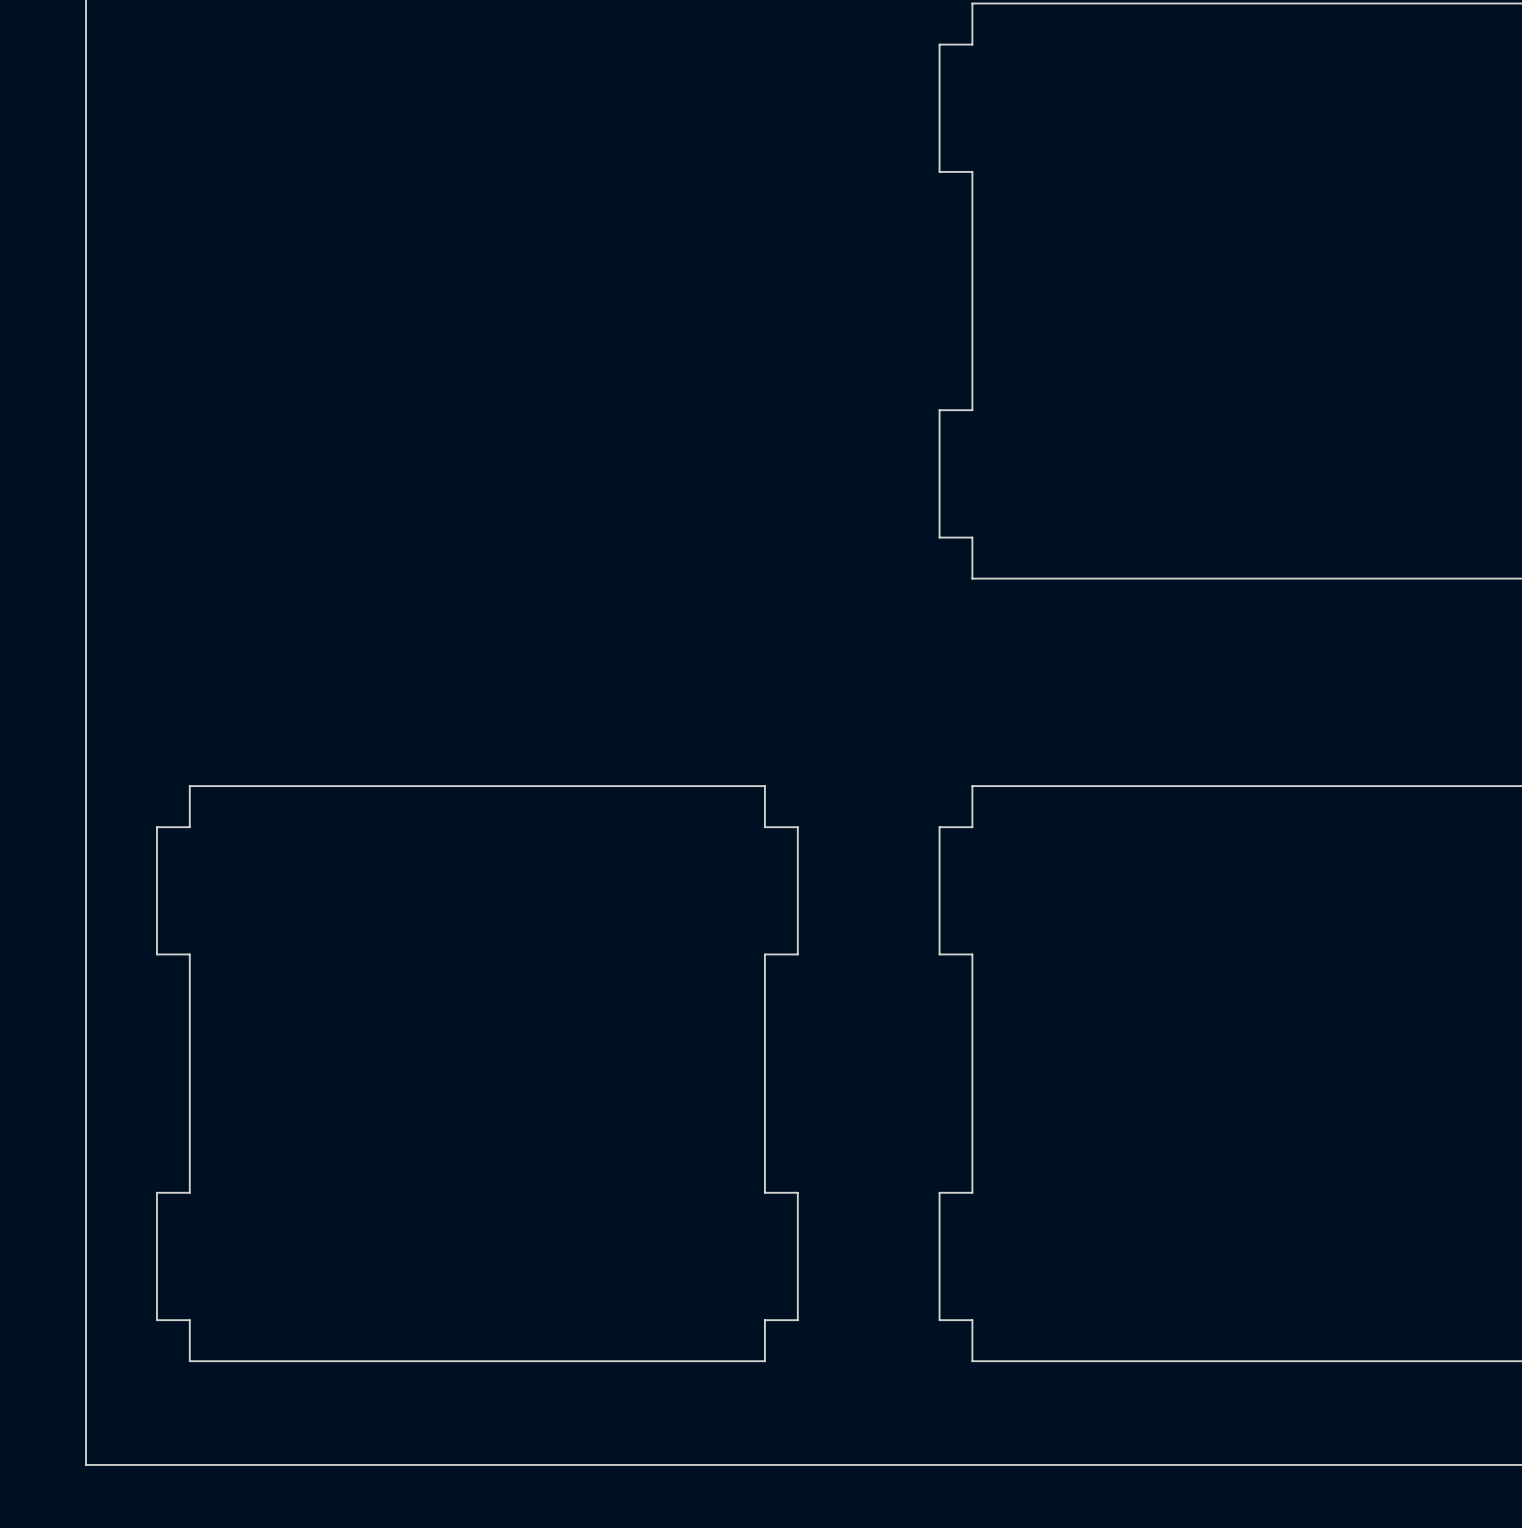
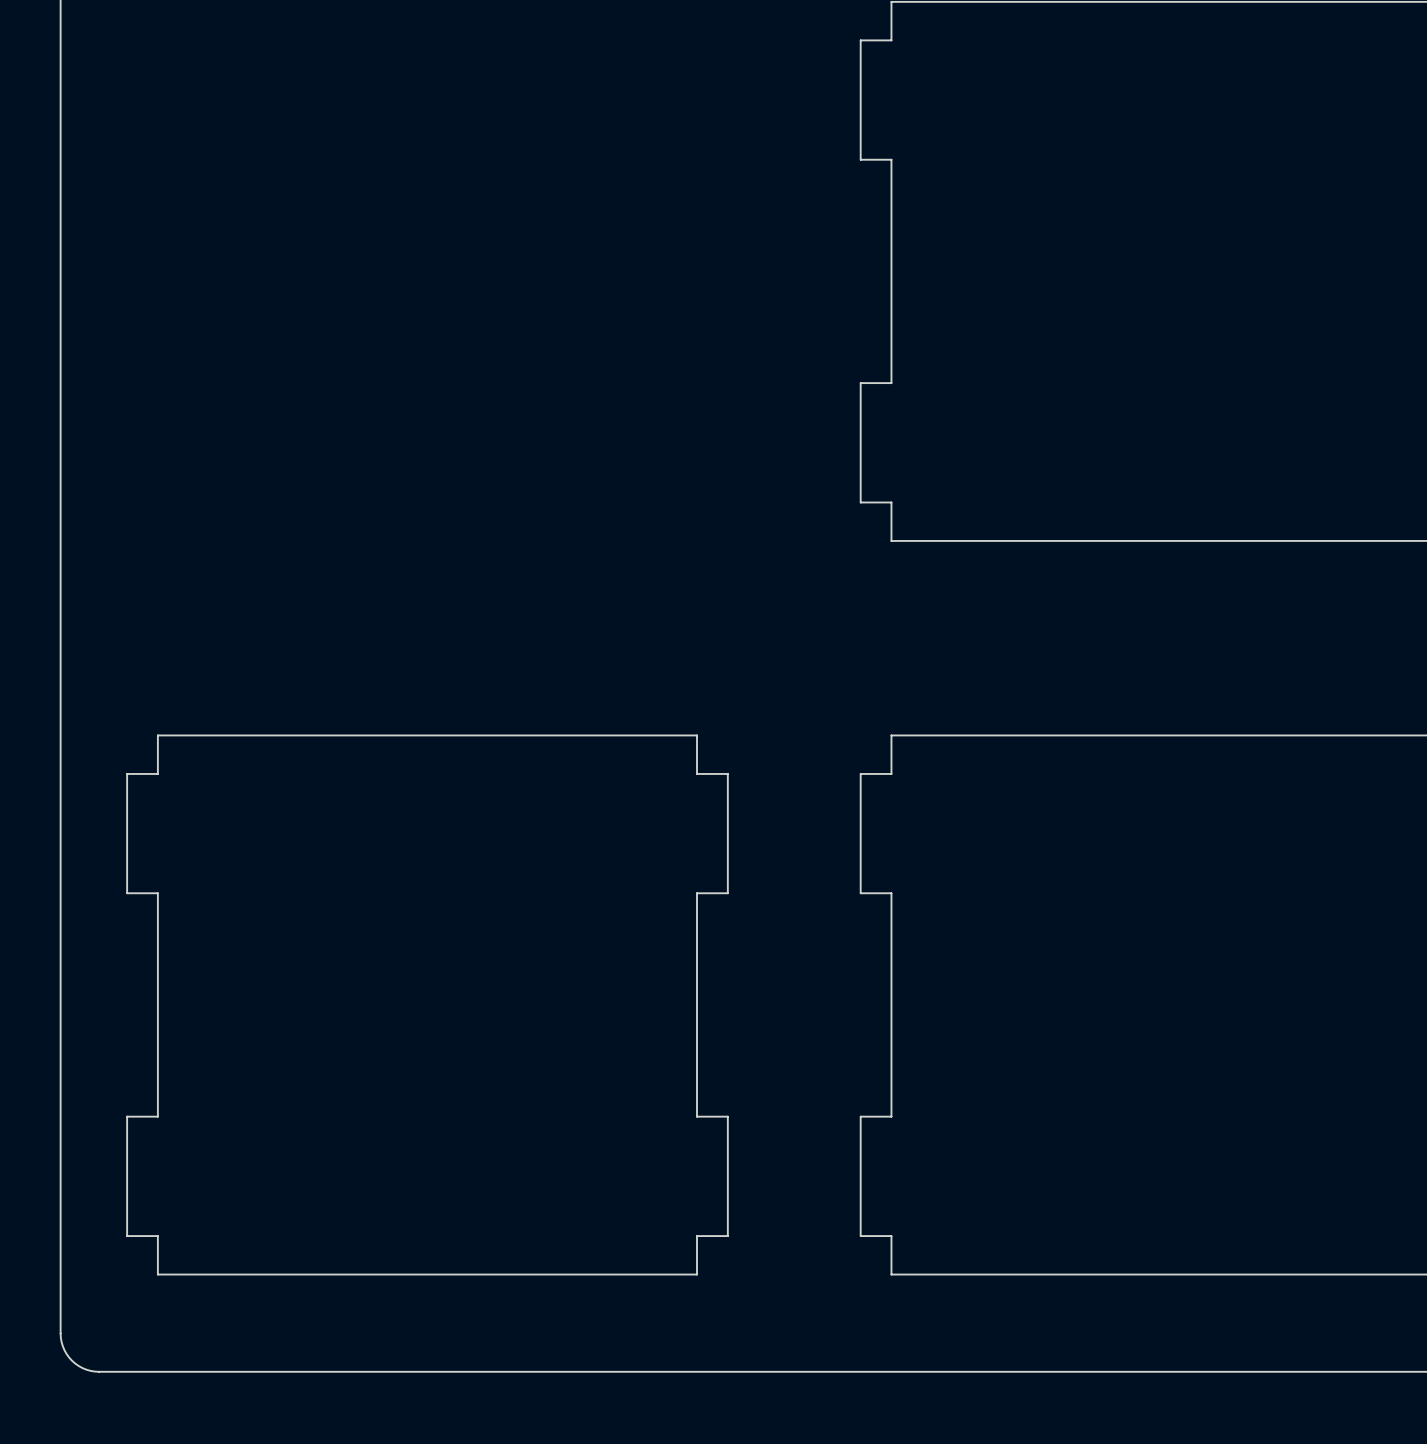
board edge: (86, 1424) (86, 1464) (126, 1464) -> (60, 1333) (62, 1346) (71, 1360) (86, 1369) (99, 1371)

